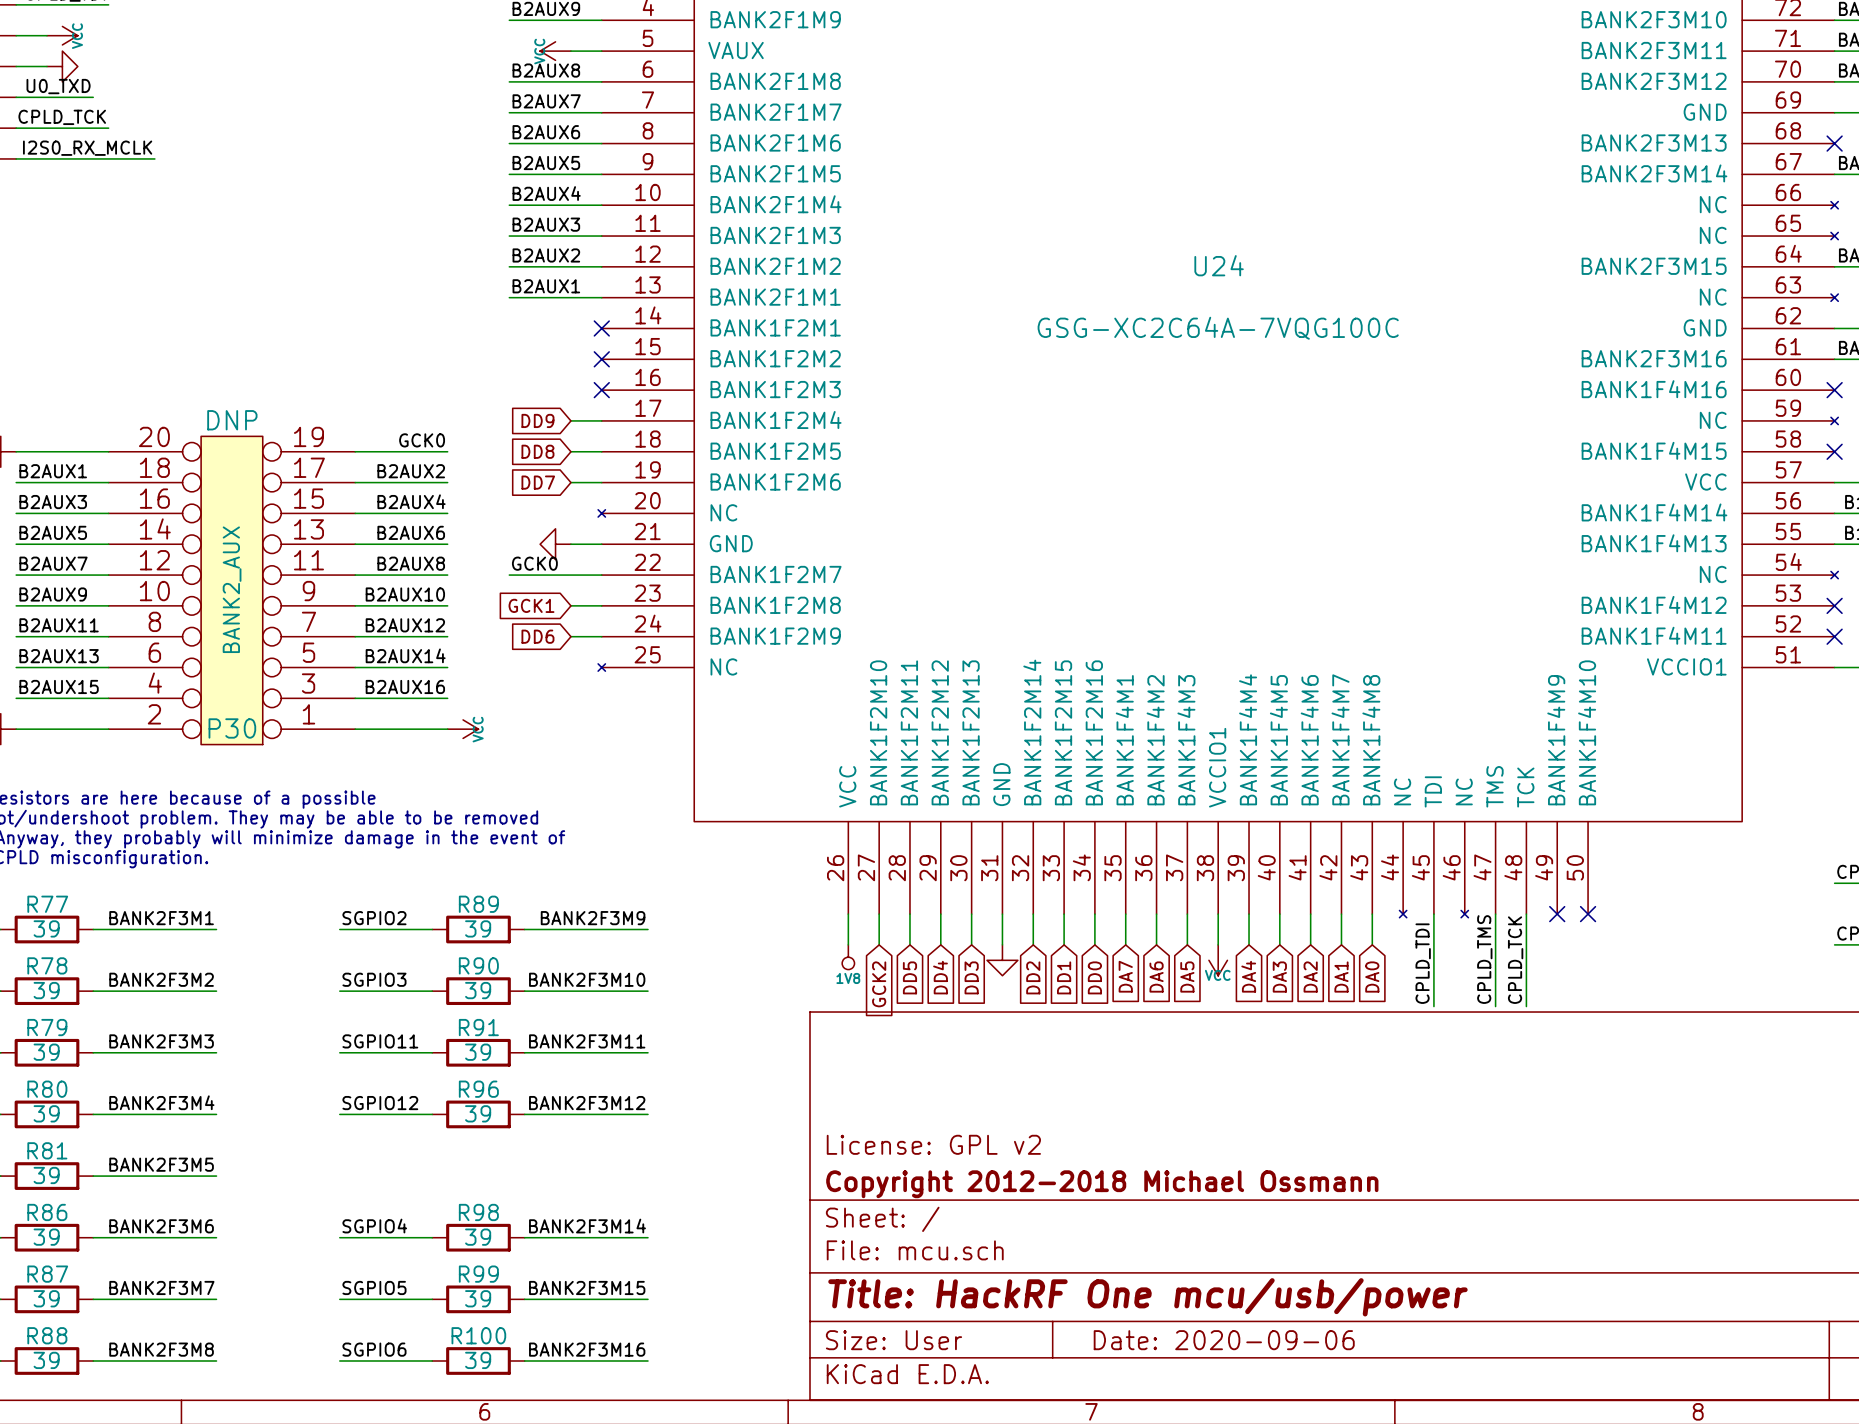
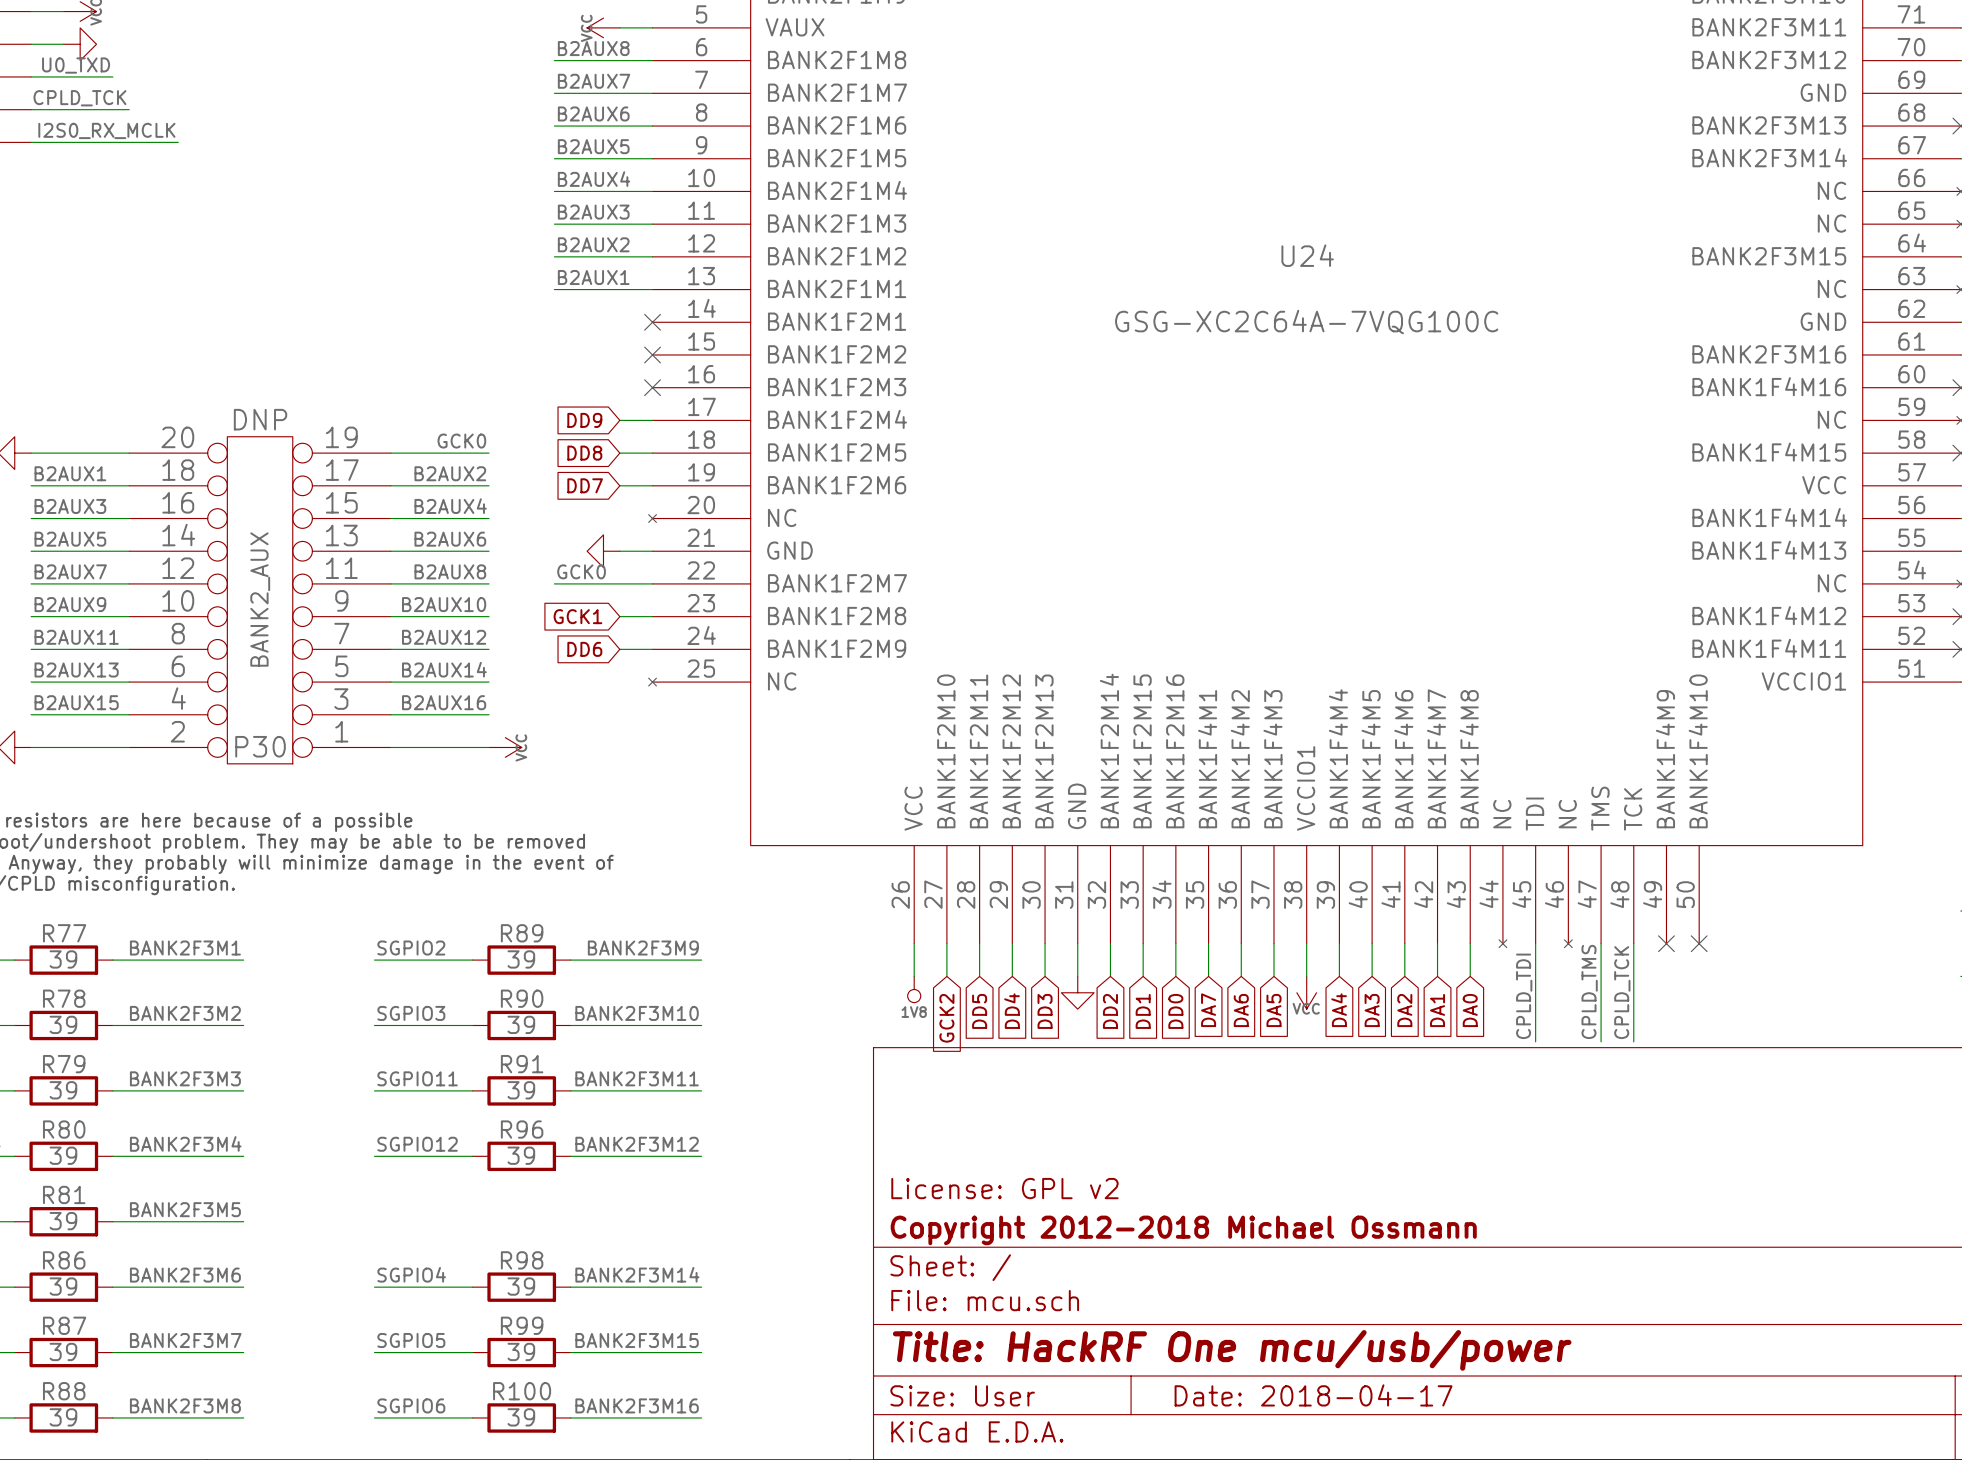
title block: Date: 2020-09-06 (1224, 1340) -> Date: 2018-04-17 (1313, 1395)

